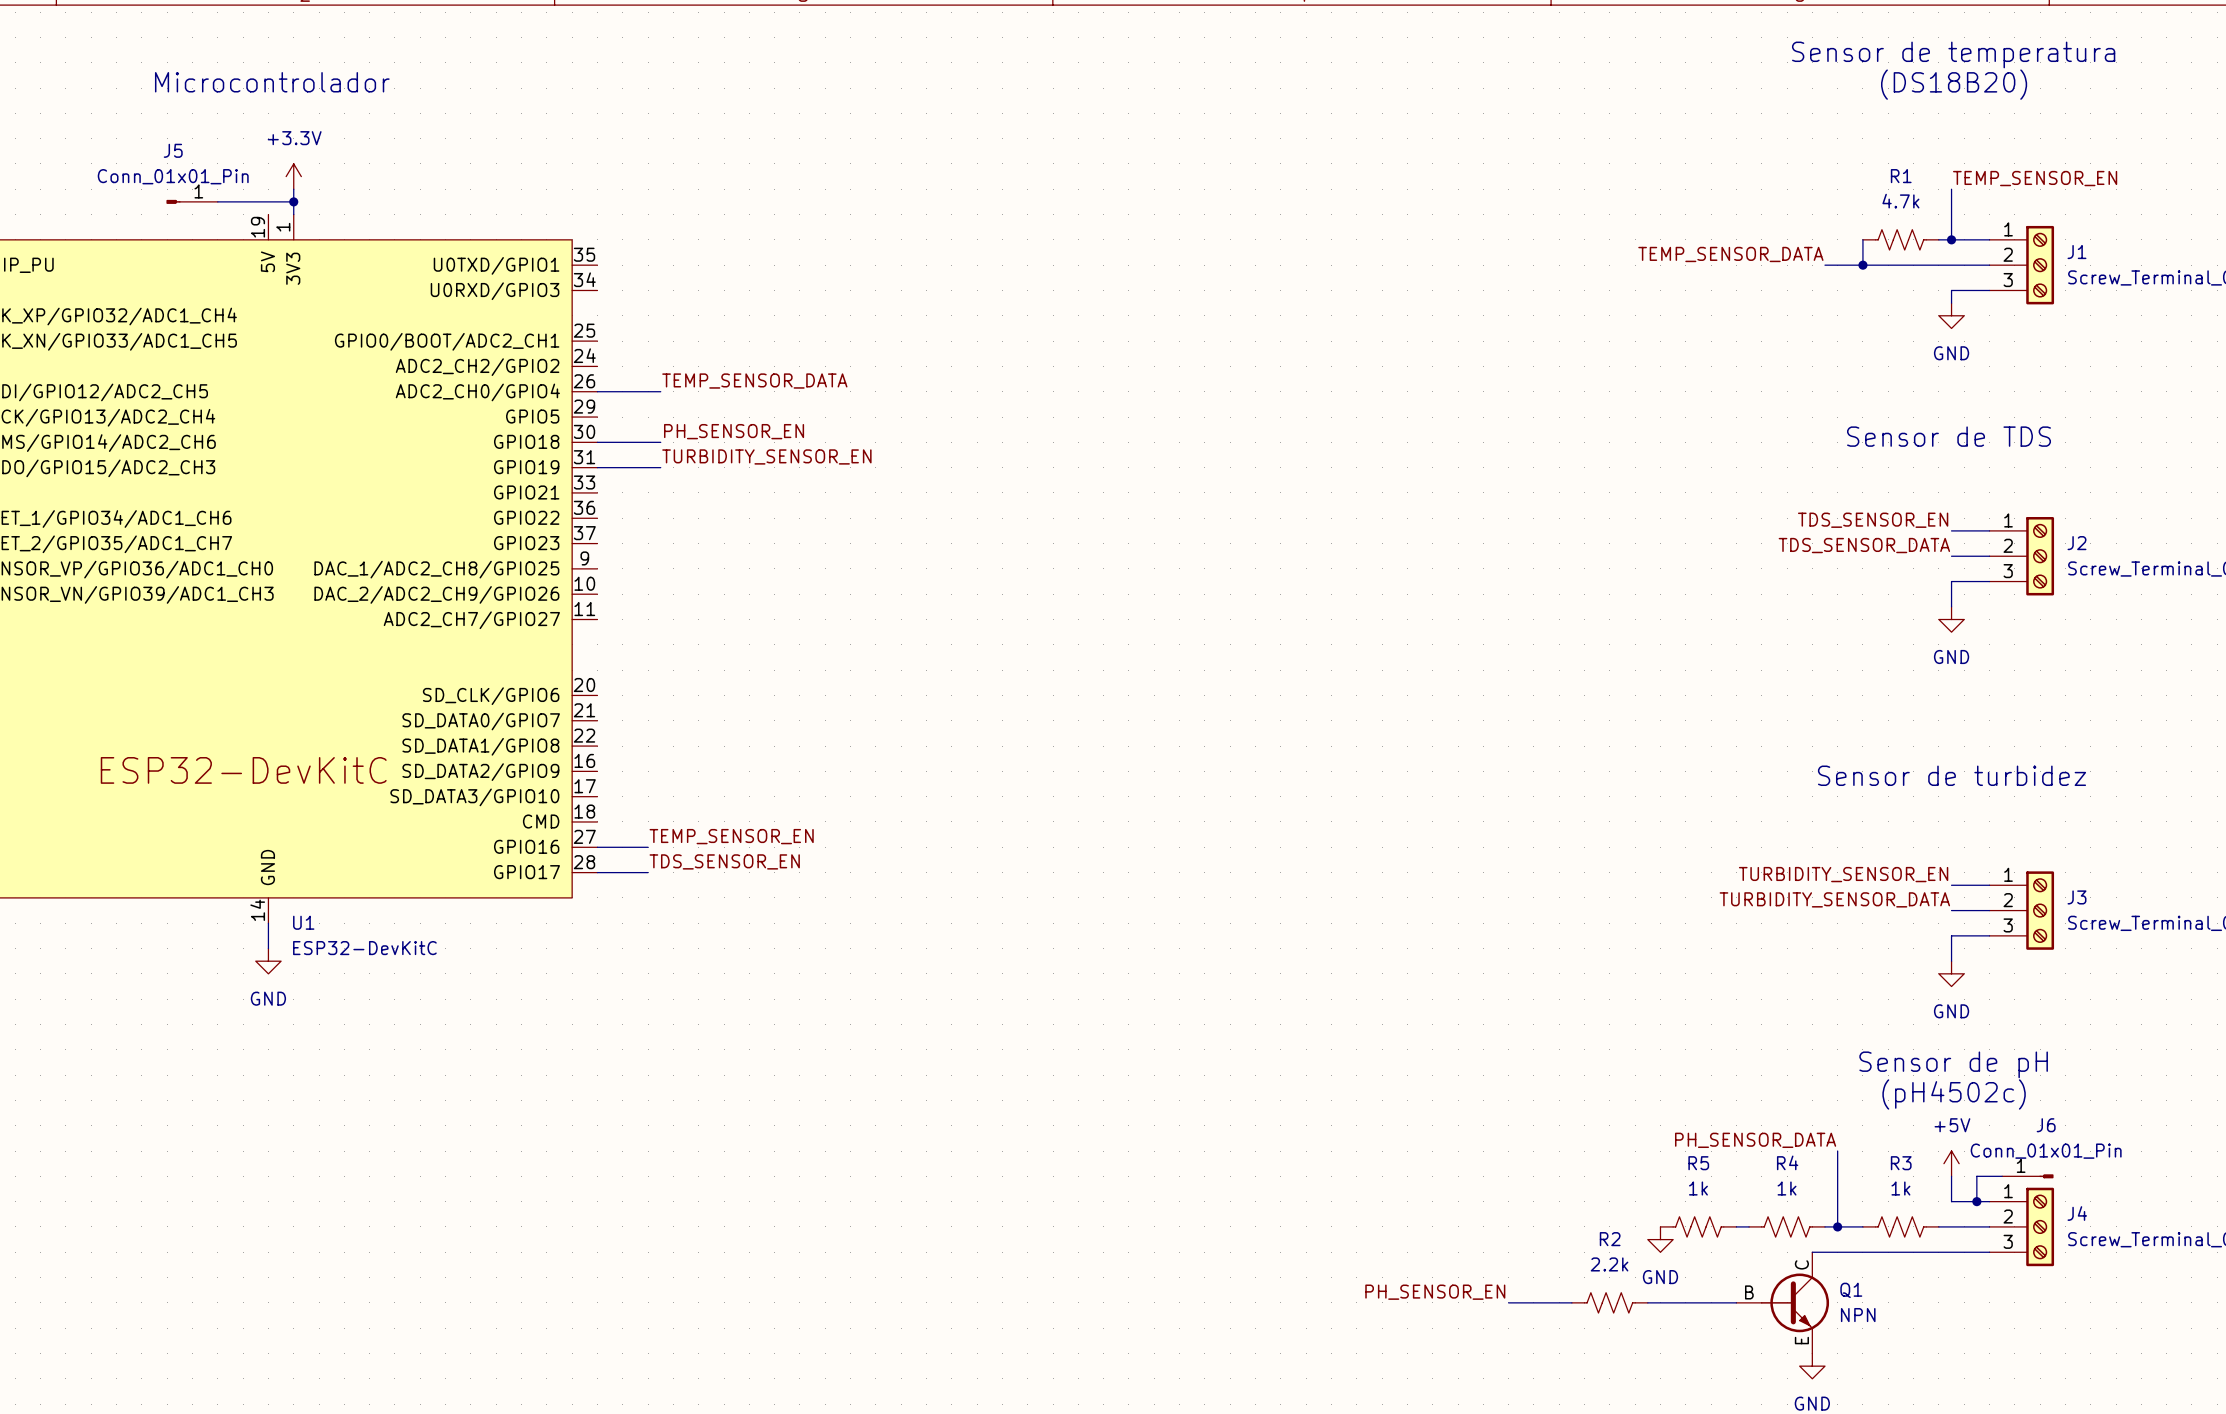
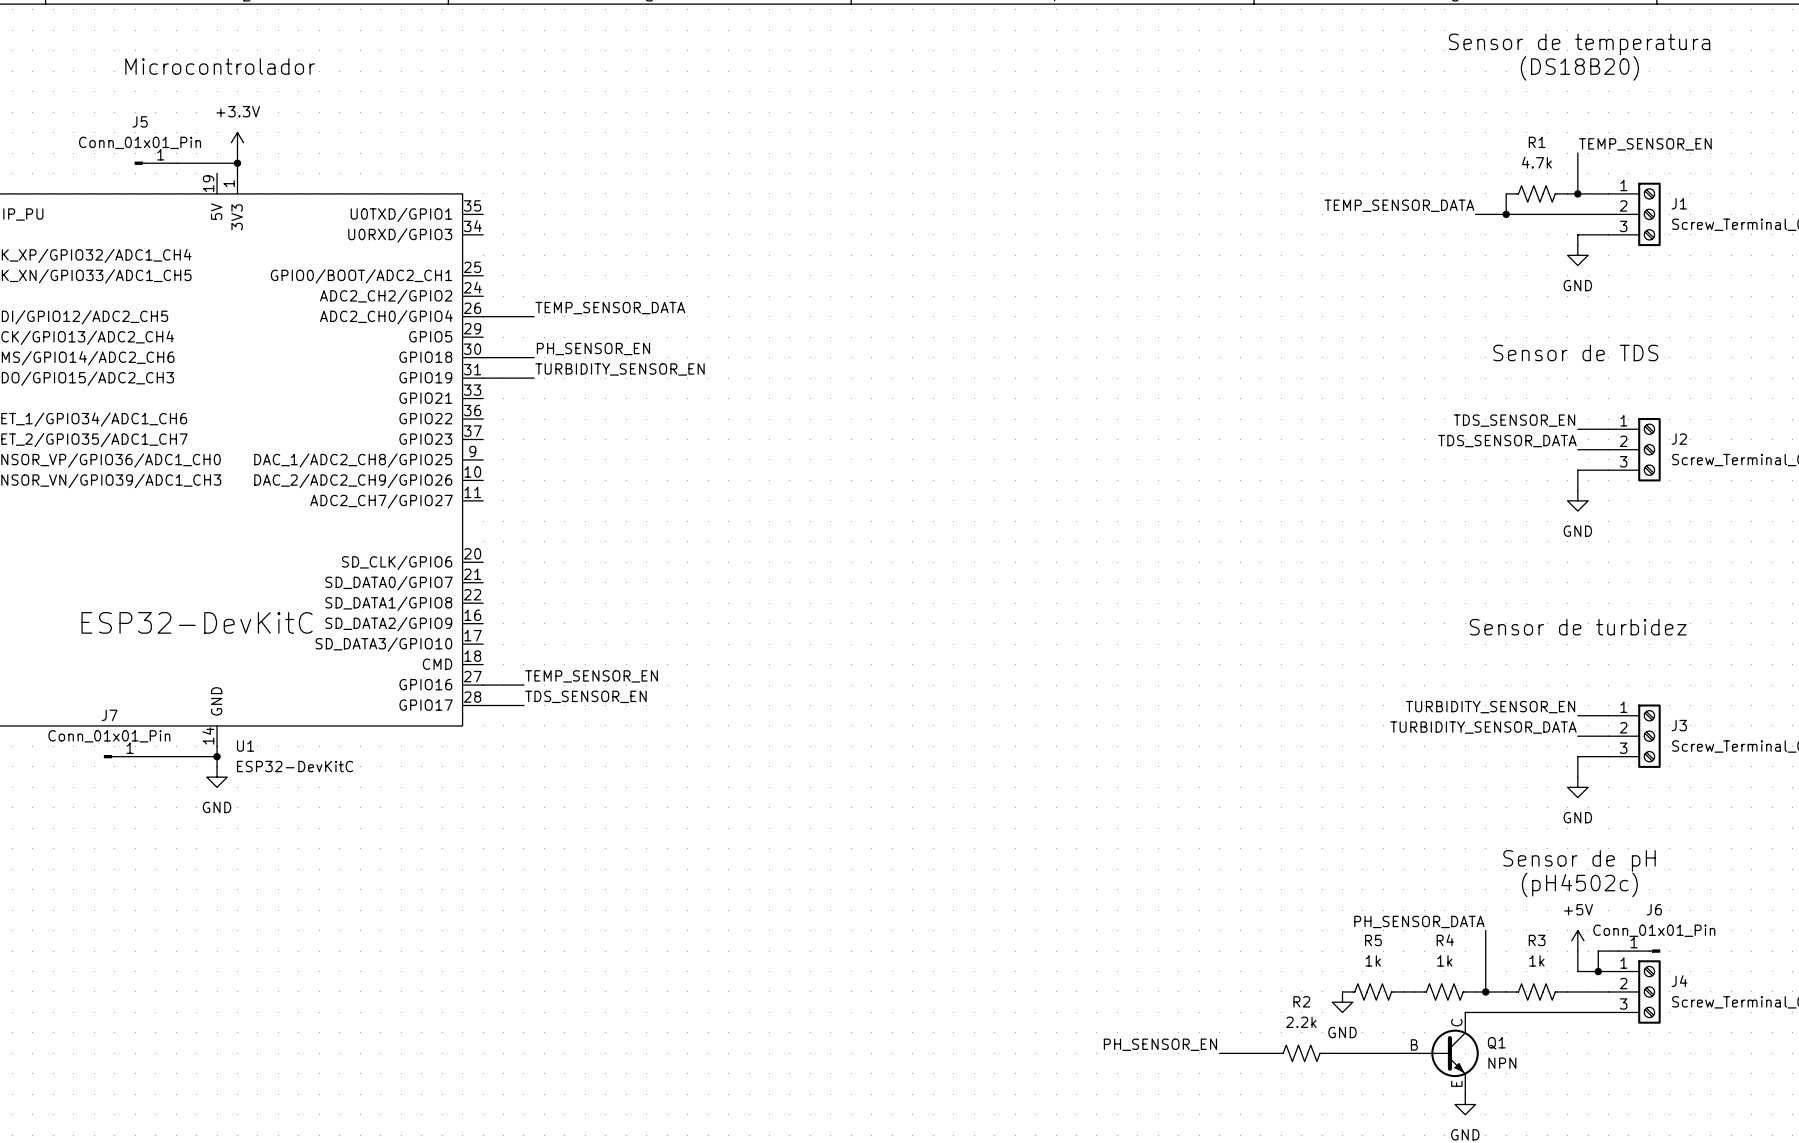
J7: none -> Conn_01x01_Pin (124, 756)
wire: none -> (145, 756) (217, 756)
junction: none -> (217, 756)

